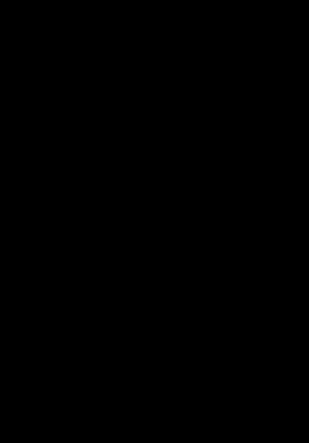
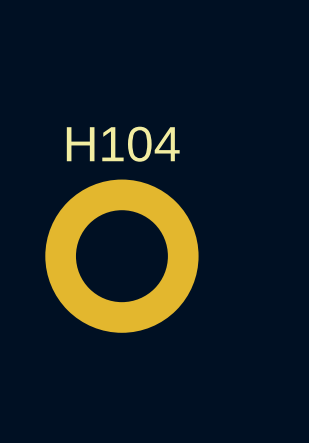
H104: none -> (121, 256)

